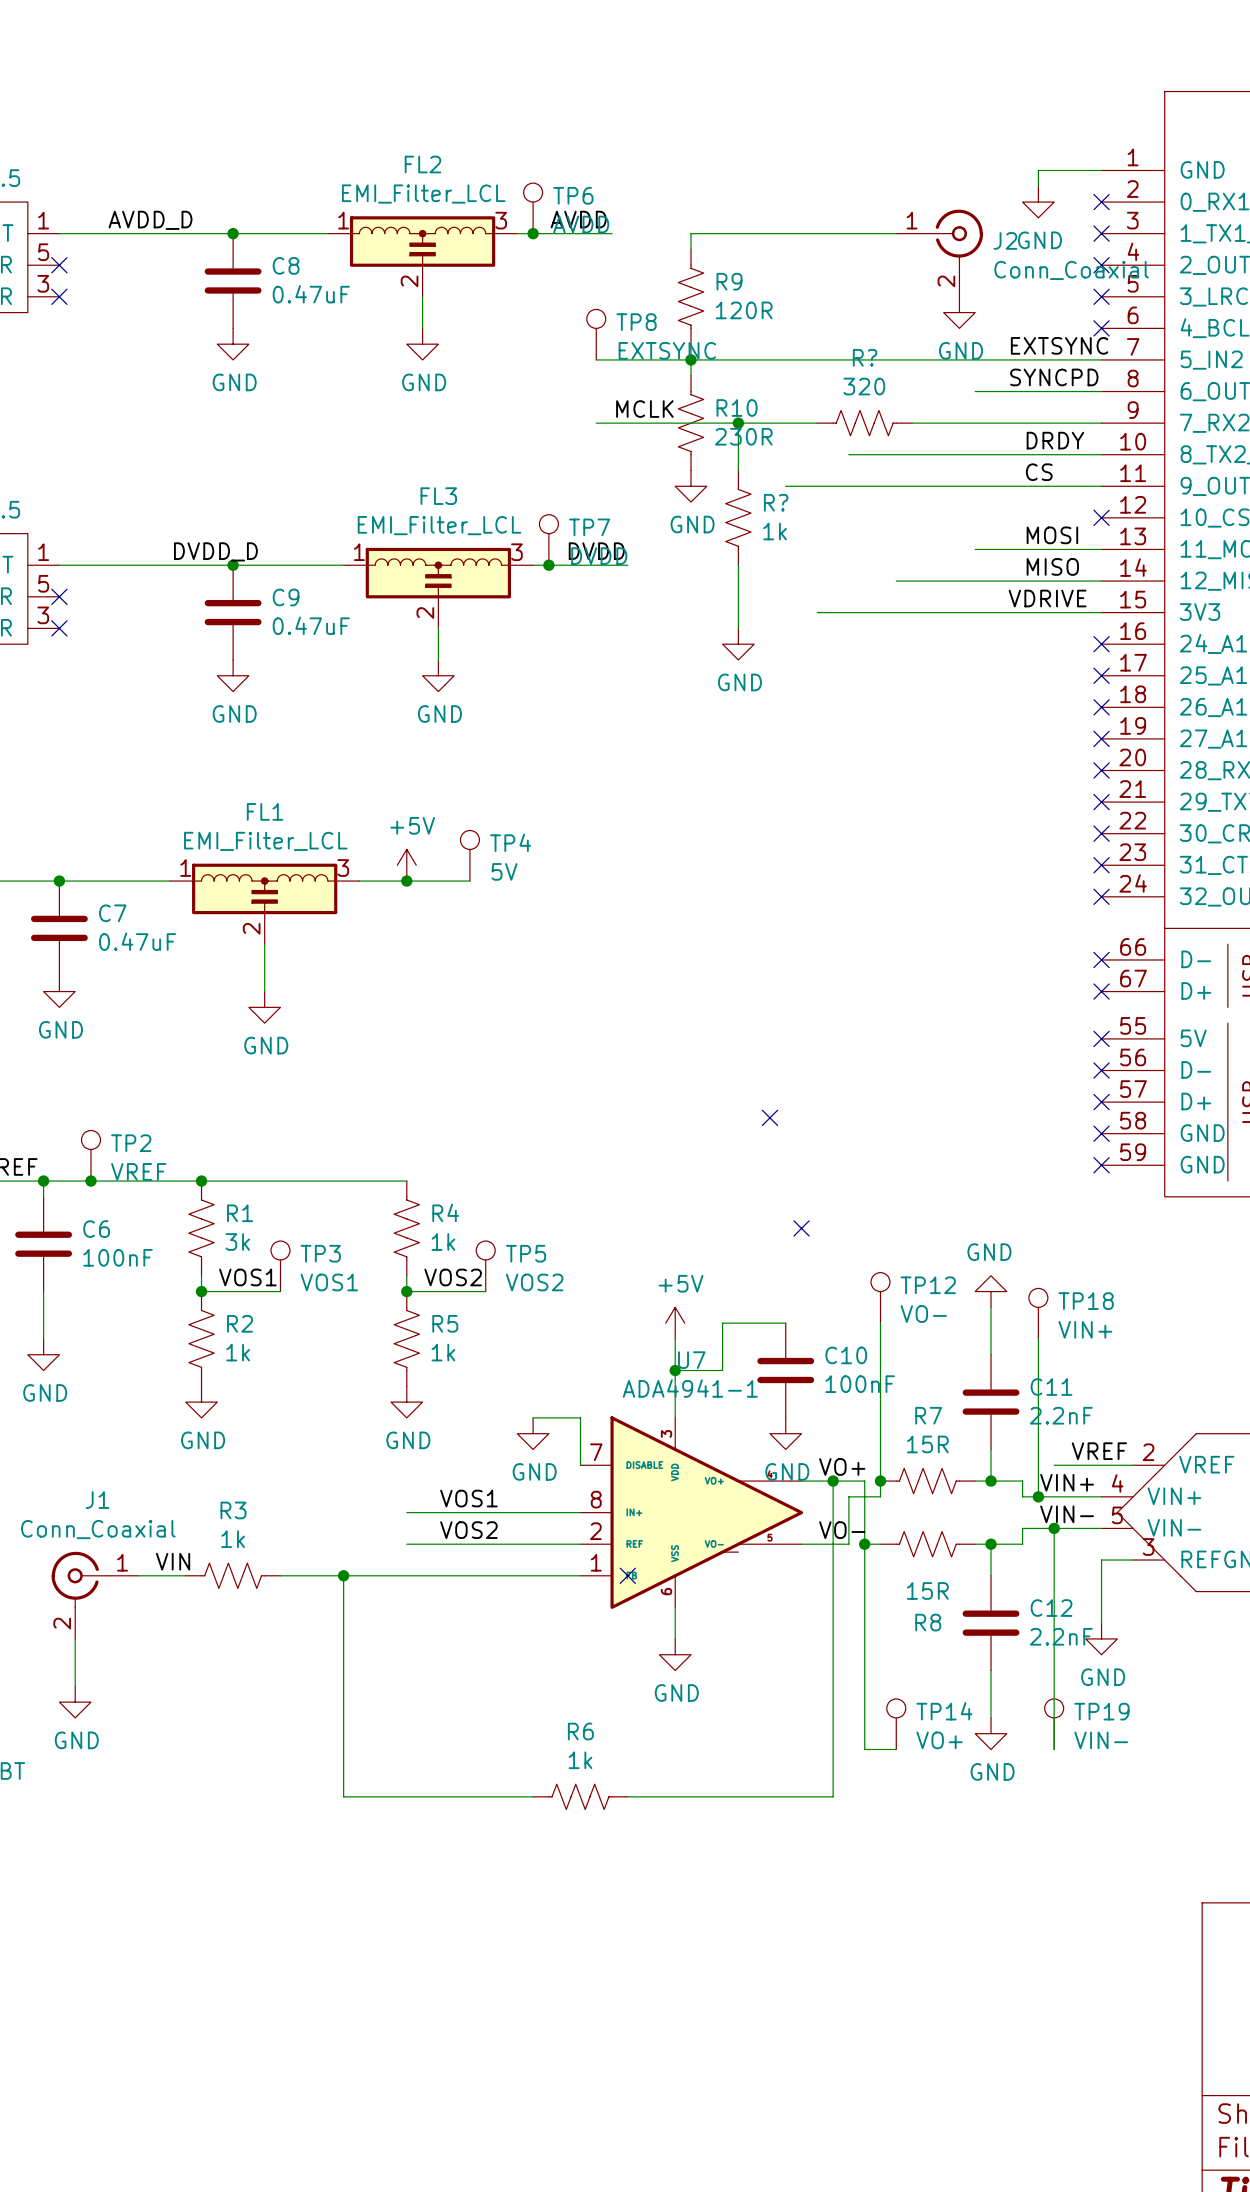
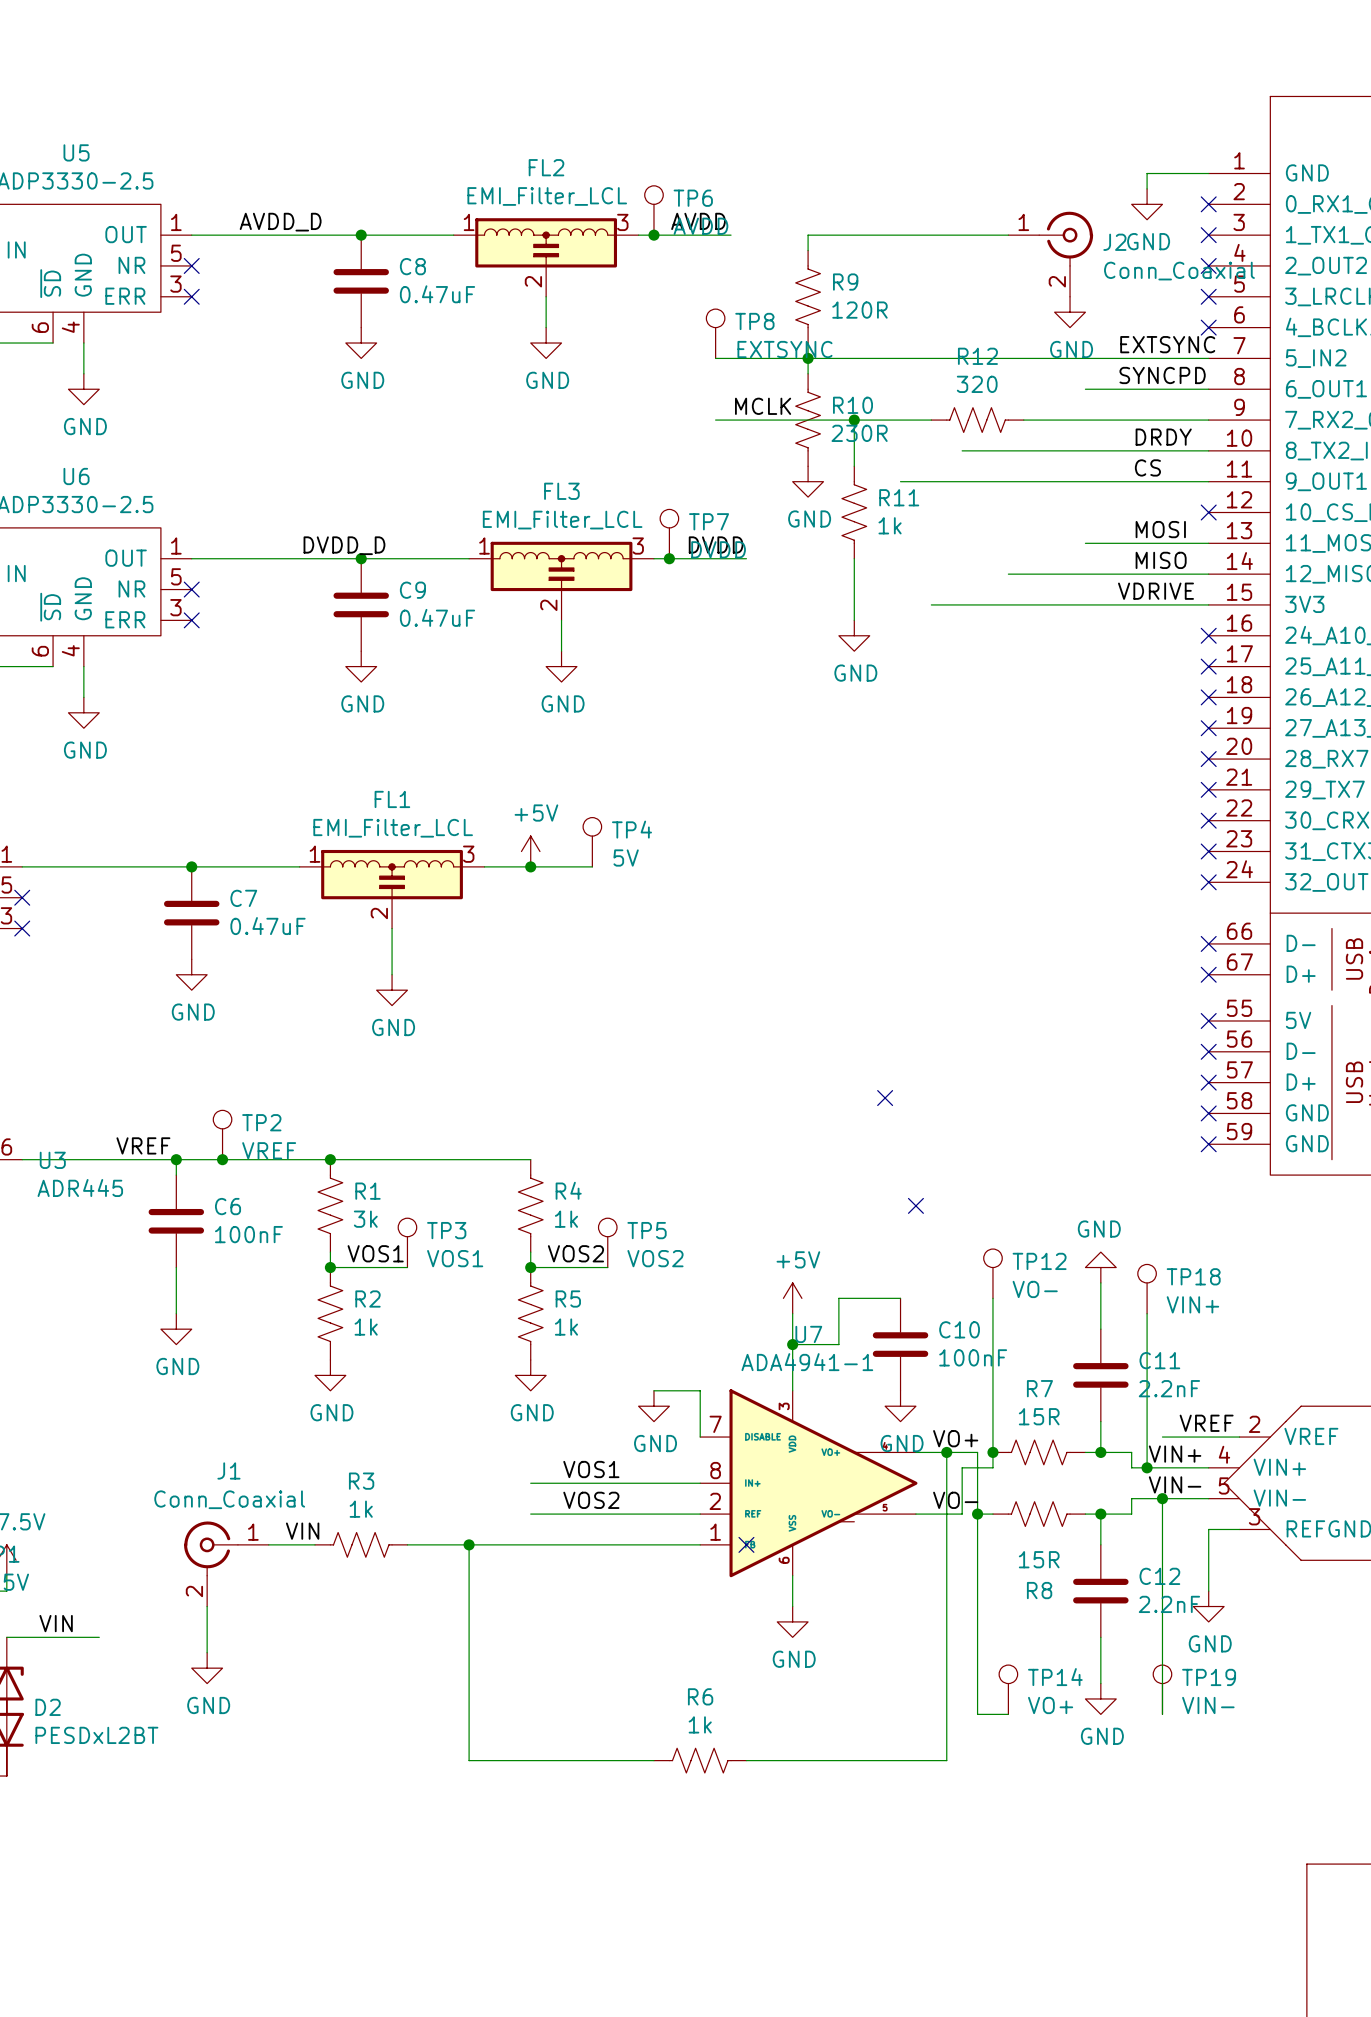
R? name: R? (865, 357) -> R12 (977, 356)
R? name: R? (776, 502) -> R11 (899, 497)

